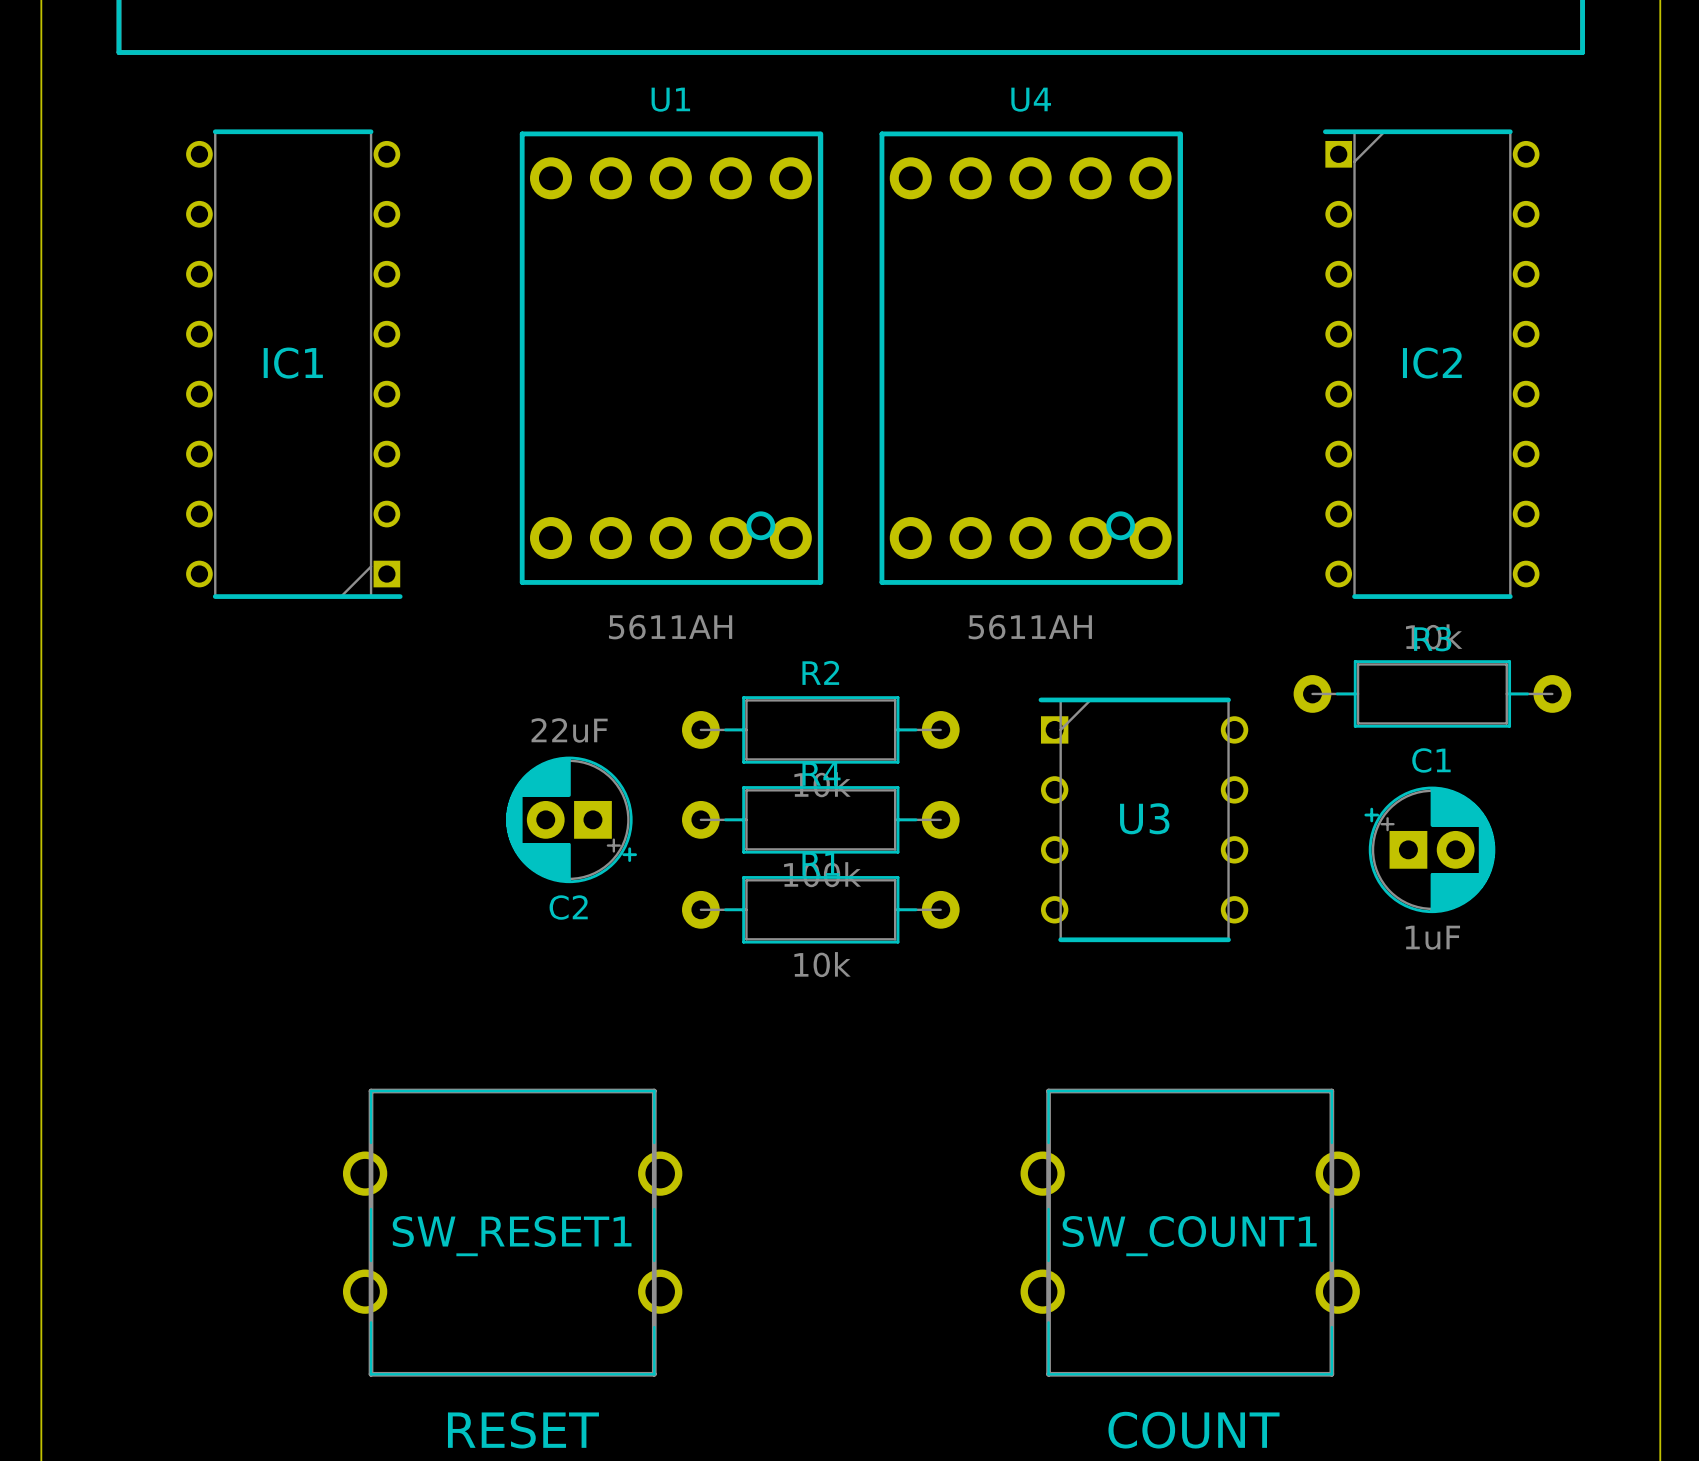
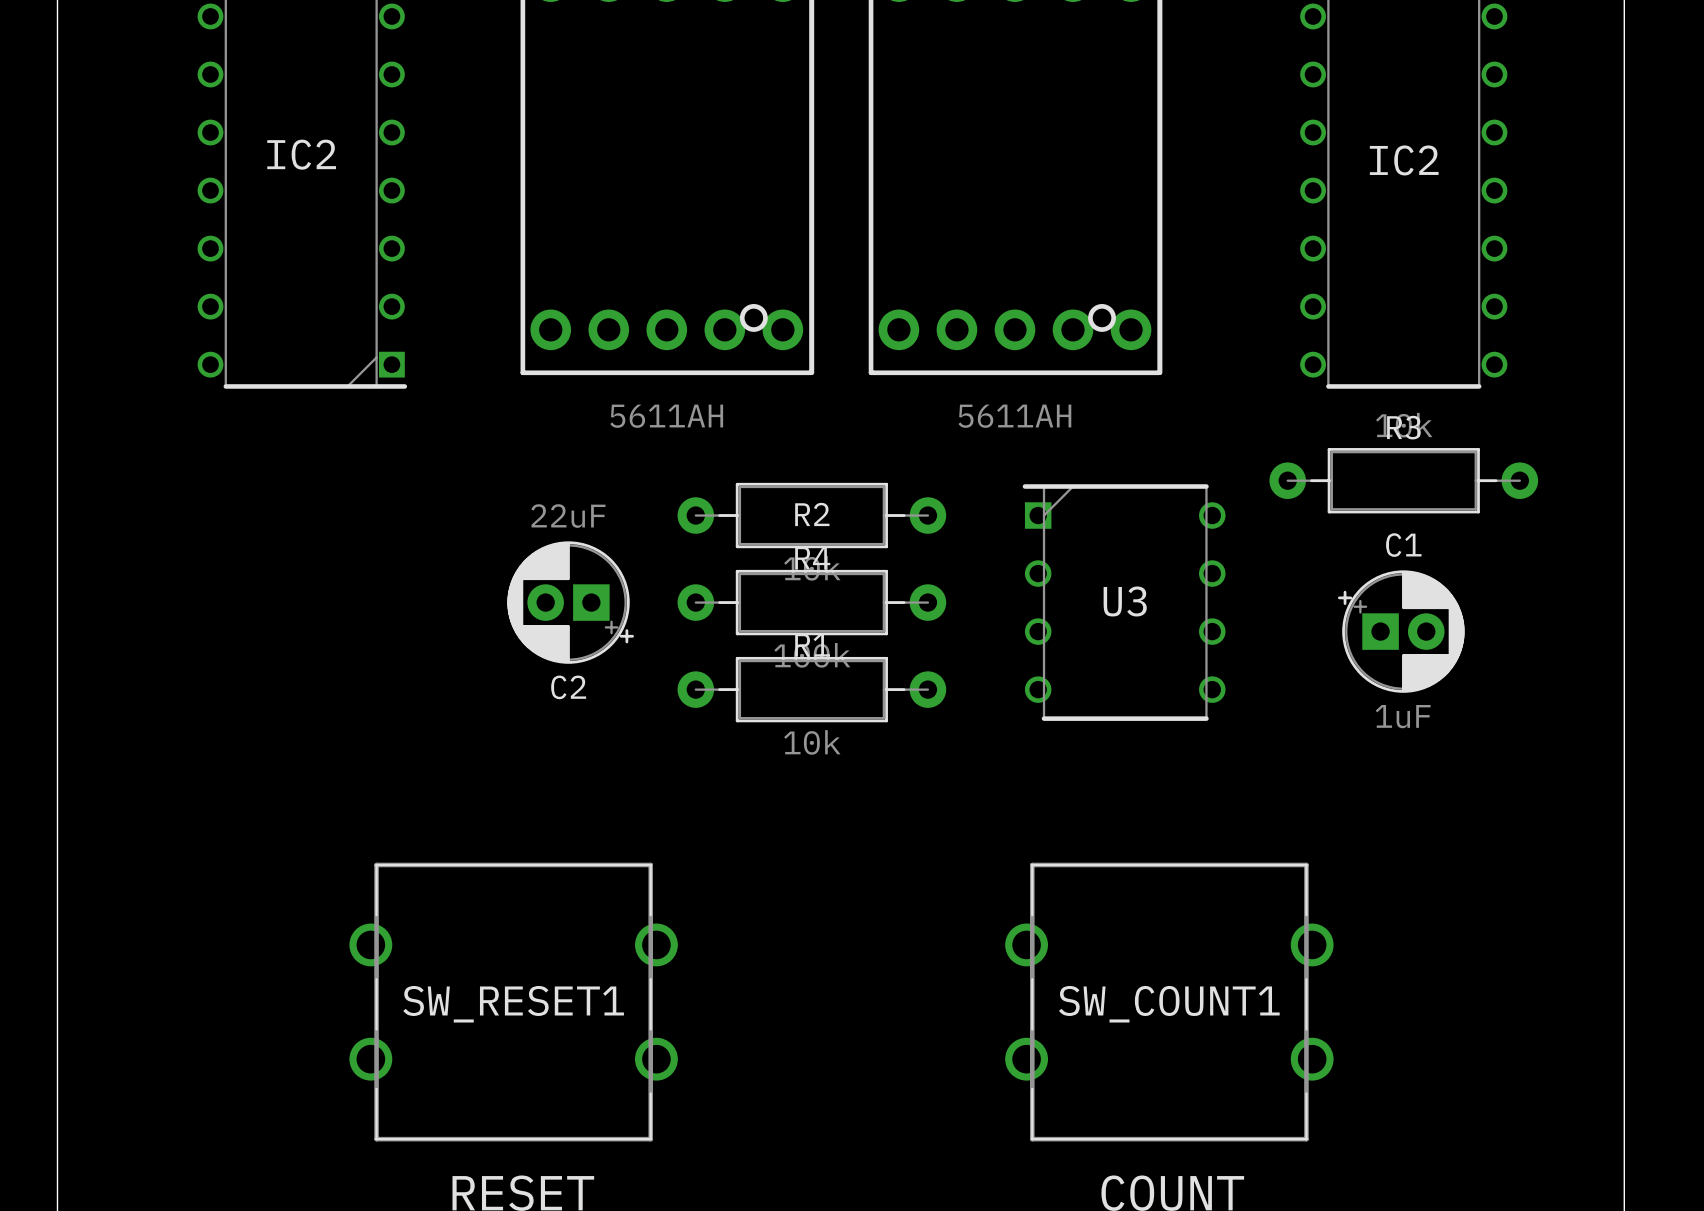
IC1 name: IC1 (293, 363) -> IC2 (301, 154)
R2 name position: R2 (820, 672) -> R2 (812, 514)

